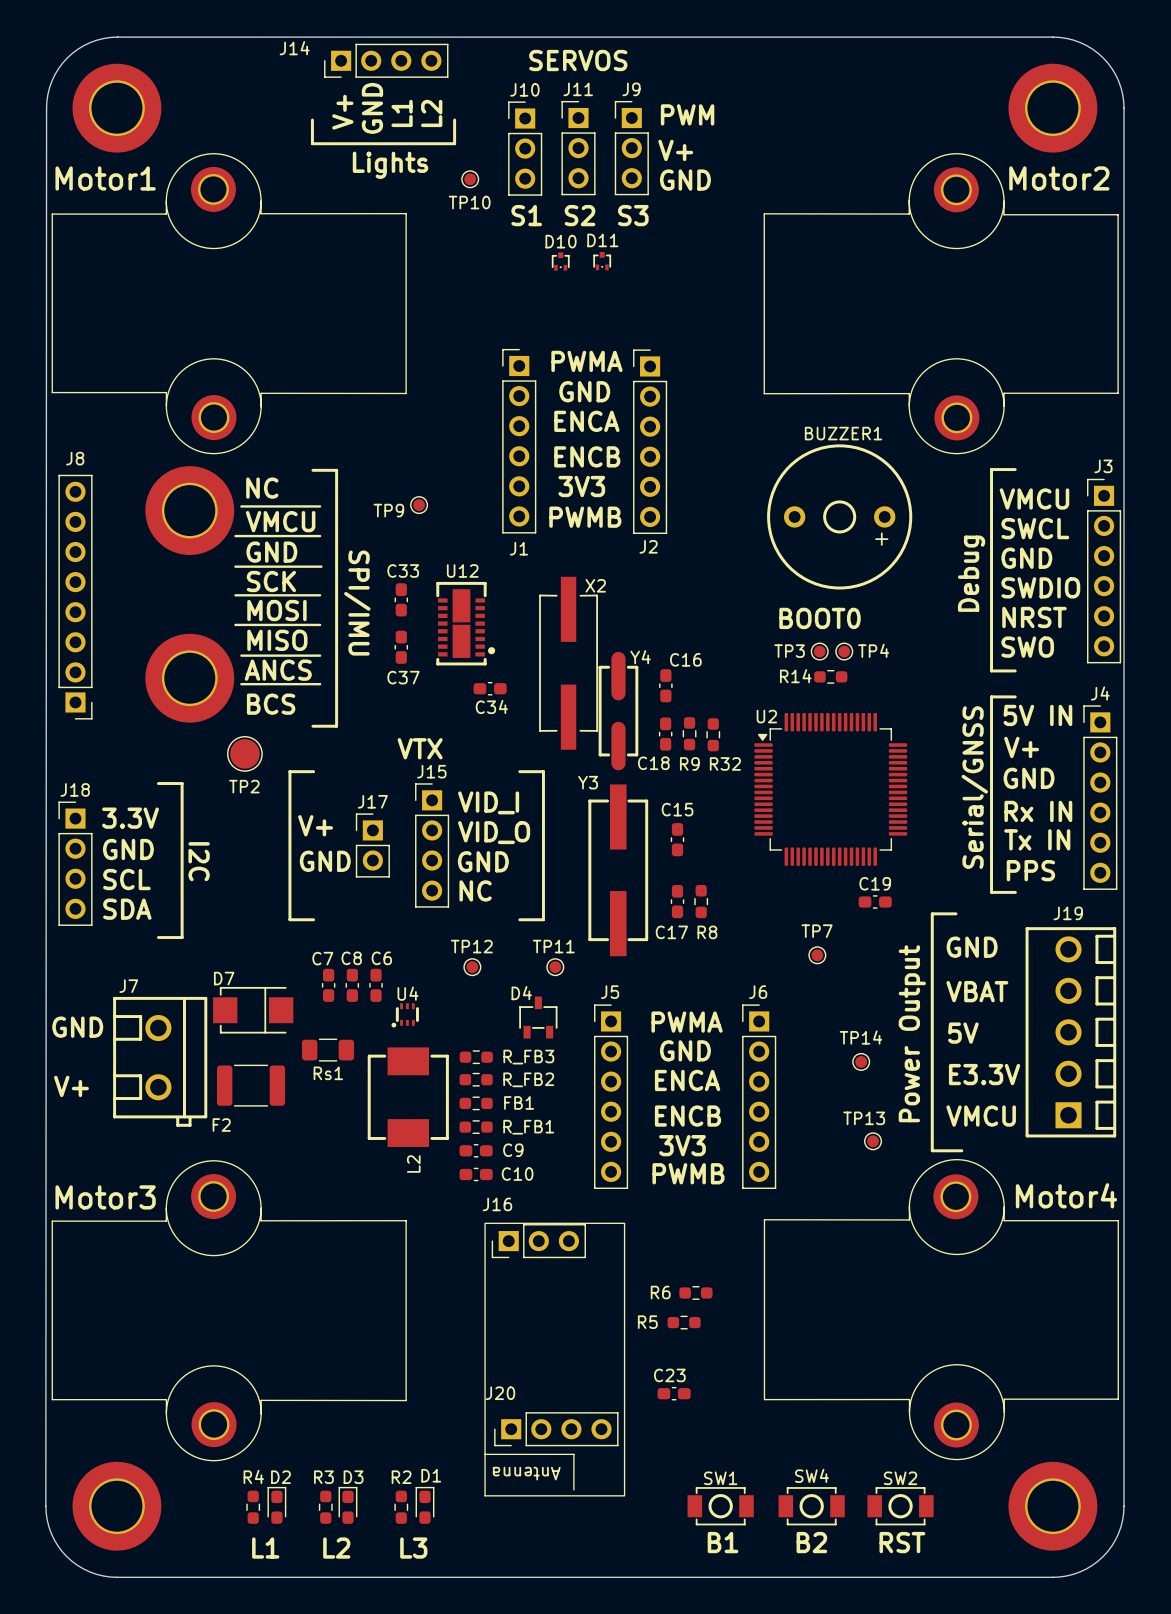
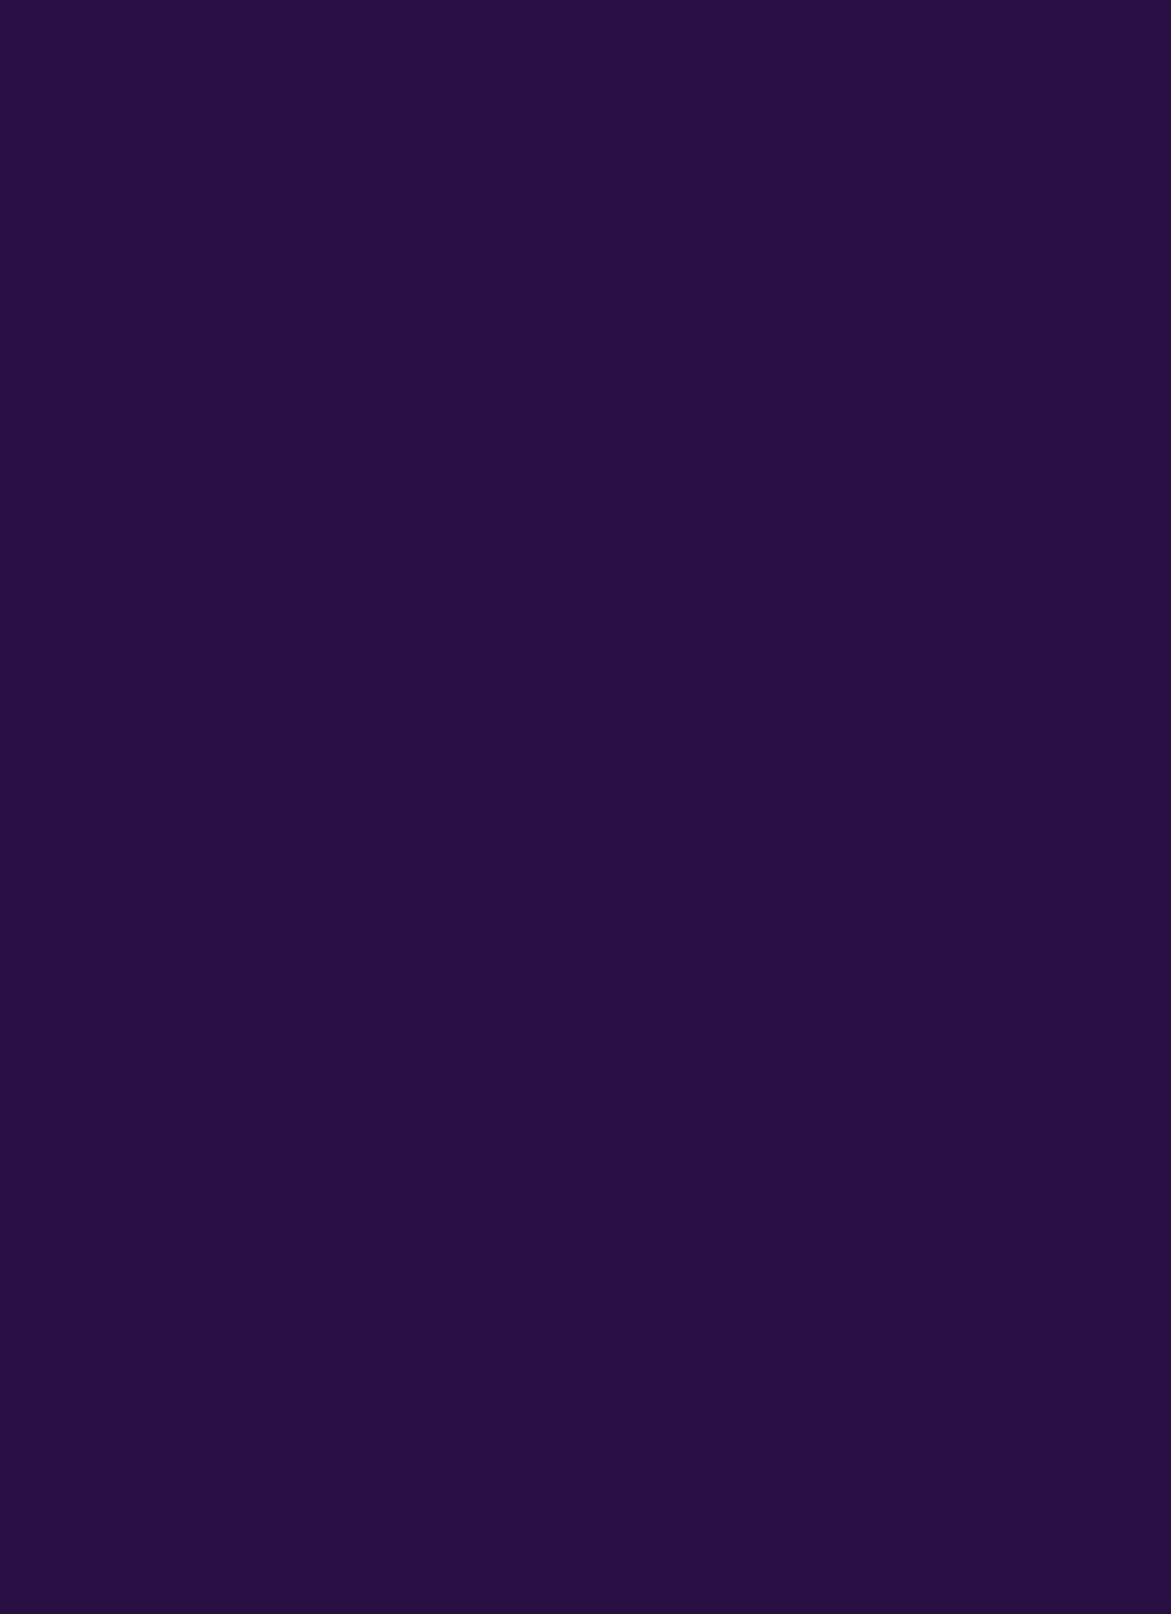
board edge: (117, 37) (1052, 37) (1073, 40) (1086, 45) (1103, 57) (1112, 68) (1120, 87) (1124, 108) (1124, 1506) (1122, 1520) (1115, 1539) (1103, 1556) (1092, 1565) (1073, 1574) (1052, 1577) (116, 1577) (96, 1574) (83, 1568) (71, 1561) (57, 1545) (48, 1526) (45, 1506) (46, 108) (51, 80) (67, 57) (90, 42) (117, 37) -> none
J14: (386, 60) -> none
text: SERVOS (578, 60) -> none
part: (116, 108) -> none
text: GND (372, 108) -> none
part: (1052, 108) -> none
text: V+ (342, 112) -> none
text: L1 (402, 113) -> none
text: L2 (431, 113) -> none
text: PWM (687, 114) -> none
line: (312, 120) (312, 143) (454, 143) (454, 120) -> none
J10: (525, 148) -> none
J11: (578, 148) -> none
J9: (631, 148) -> none
text: V+ (675, 150) -> none
text: Lights (390, 165) -> none
TP10: (470, 179) -> none
text: GND (685, 180) -> none
part: (213, 189) -> none
part: (956, 189) -> none
text: S1 (526, 215) -> none
text: S2 (579, 215) -> none
text: S3 (633, 215) -> none
D10: (560, 261) -> none
D11: (602, 261) -> none
Motor1: (229, 303) -> none
Motor2: (941, 303) -> none
text: PWMA (586, 361) -> none
text: GND (584, 391) -> none
part: (213, 417) -> none
part: (956, 417) -> none
text: ENCA (586, 421) -> none
J1: (519, 441) -> none
J2: (650, 441) -> none
text: ENCB (587, 456) -> none
line: (1015, 469) (991, 469) (991, 670) (1015, 670) -> none
line: (312, 470) (336, 470) (336, 726) (312, 726) -> none
text: 3V3 (581, 486) -> none
text: NC (262, 488) -> none
text: VMCU (1034, 499) -> none
TP9: (419, 505) -> none
line: (241, 506) (320, 506) -> none
part: (189, 510) -> none
BUZZER1: (839, 516) -> none
text: PWMB (585, 517) -> none
text: VMCU (280, 521) -> none
text: SWCL (1035, 528) -> none
line: (235, 536) (320, 536) -> none
text: GND (271, 552) -> none
text: GND (1026, 558) -> none
line: (235, 566) (321, 566) -> none
J3: (1104, 571) -> none
text: Debug (971, 573) -> none
text: SCK (271, 581) -> none
text: SWDIO (1040, 587) -> none
line: (235, 595) (320, 595) -> none
J8: (75, 597) -> none
C33: (401, 599) -> none
text: SPI/IMU (357, 603) -> none
text: MOSI (276, 610) -> none
text: NRST (1034, 617) -> none
text: BOOT0 (820, 618) -> none
U12: (465, 623) -> none
line: (235, 624) (320, 624) -> none
text: MISO (277, 640) -> none
C37: (401, 647) -> none
text: SWO (1027, 647) -> none
TP3: (819, 651) -> none
TP4: (844, 651) -> none
line: (241, 655) (320, 655) -> none
X2: (568, 663) -> none
text: ANCS (278, 670) -> none
R14: (830, 676) -> none
part: (189, 678) -> none
line: (241, 684) (320, 684) -> none
C16: (665, 685) -> none
C34: (490, 688) -> none
line: (1015, 696) (991, 696) (991, 892) -> none
text: BCS (271, 704) -> none
Y4: (618, 711) -> none
text: 5V IN (1037, 715) -> none
R9: (689, 733) -> none
C18: (665, 734) -> none
R32: (713, 734) -> none
text: V+ (1021, 747) -> none
text: VTX (420, 748) -> none
TP2: (244, 753) -> none
line: (313, 771) (289, 771) (289, 919) (313, 919) -> none
line: (519, 771) (543, 771) (543, 919) (519, 919) -> none
text: GND (1029, 778) -> none
line: (158, 783) (182, 783) (182, 937) (158, 937) -> none
text: Serial/GNSS (974, 787) -> none
U2: (830, 789) -> none
J4: (1100, 797) -> none
text: VID_I (488, 802) -> none
text: Rx IN (1038, 811) -> none
text: 3.3V (130, 818) -> none
text: V+ (315, 825) -> none
text: VID_O (494, 832) -> none
C15: (677, 839) -> none
text: Tx IN (1037, 839) -> none
J17: (372, 845) -> none
J15: (432, 845) -> none
text: GND (128, 849) -> none
text: I2C (199, 861) -> none
text: GND (325, 861) -> none
text: GND (483, 861) -> none
J18: (75, 863) -> none
Y3: (618, 870) -> none
text: PPS (1030, 870) -> none
text: SCL (126, 879) -> none
text: NC (475, 890) -> none
line: (991, 892) (1015, 892) -> none
C17: (677, 901) -> none
R8: (701, 901) -> none
C19: (875, 901) -> none
text: SDA (127, 909) -> none
line: (955, 913) (932, 913) (932, 1150) (961, 1150) -> none
text: GND (972, 947) -> none
TP7: (817, 955) -> none
TP12: (472, 967) -> none
TP11: (555, 967) -> none
C7: (328, 985) -> none
C8: (352, 985) -> none
C6: (376, 985) -> none
text: VBAT (977, 991) -> none
D7: (253, 1010) -> none
U4: (405, 1015) -> none
D4: (538, 1017) -> none
text: PWMA (687, 1022) -> none
text: GND (77, 1027) -> none
J19: (1070, 1032) -> none
text: Power Output (912, 1033) -> none
text: 5V (963, 1033) -> none
Rs1: (328, 1050) -> none
text: GND (685, 1050) -> none
R_FB3: (476, 1057) -> none
J7: (160, 1061) -> none
TP14: (861, 1061) -> none
text: E3.3V (984, 1074) -> none
R_FB2: (476, 1079) -> none
text: ENCA (687, 1080) -> none
F2: (251, 1085) -> none
text: V+ (71, 1086) -> none
J5: (611, 1096) -> none
J6: (759, 1096) -> none
L2: (408, 1097) -> none
FB1: (476, 1103) -> none
text: ENCB (687, 1116) -> none
text: VMCU (981, 1116) -> none
R_FB1: (476, 1127) -> none
TP13: (873, 1141) -> none
text: 3V3 (682, 1145) -> none
C9: (476, 1150) -> none
text: PWMB (688, 1173) -> none
C10: (476, 1174) -> none
part: (213, 1196) -> none
part: (955, 1196) -> none
R6: (695, 1292) -> none
Motor4: (941, 1309) -> none
Motor3: (229, 1310) -> none
R5: (684, 1322) -> none
J16: (554, 1359) -> none
C23: (674, 1393) -> none
part: (214, 1424) -> none
part: (956, 1425) -> none
J20: (556, 1429) -> none
D2: (276, 1505) -> none
D3: (347, 1505) -> none
D1: (424, 1505) -> none
part: (116, 1506) -> none
SW1: (720, 1506) -> none
SW4: (811, 1506) -> none
SW2: (900, 1506) -> none
part: (1052, 1506) -> none
R4: (253, 1507) -> none
R3: (325, 1507) -> none
R2: (401, 1507) -> none
text: B1 (723, 1542) -> none
text: B2 (811, 1542) -> none
text: RST (902, 1542) -> none
text: L1 (265, 1548) -> none
text: L2 (336, 1548) -> none
text: L3 (413, 1548) -> none

